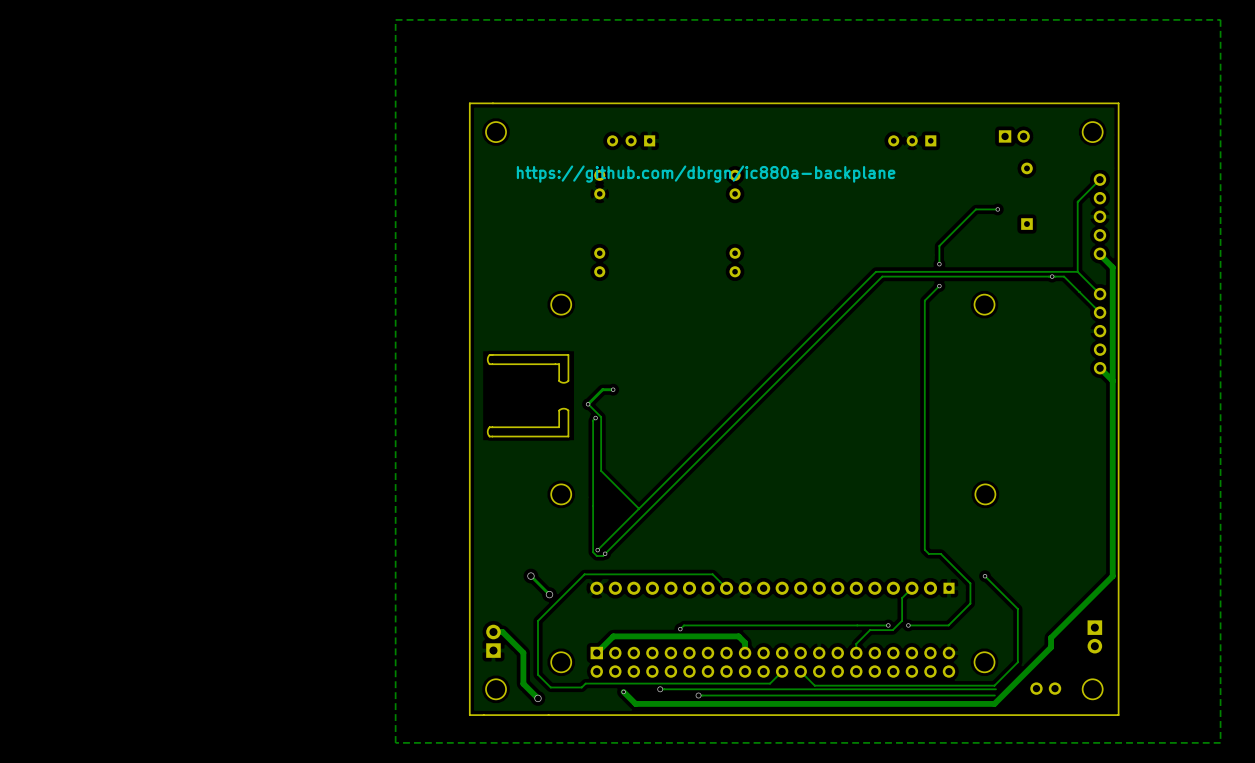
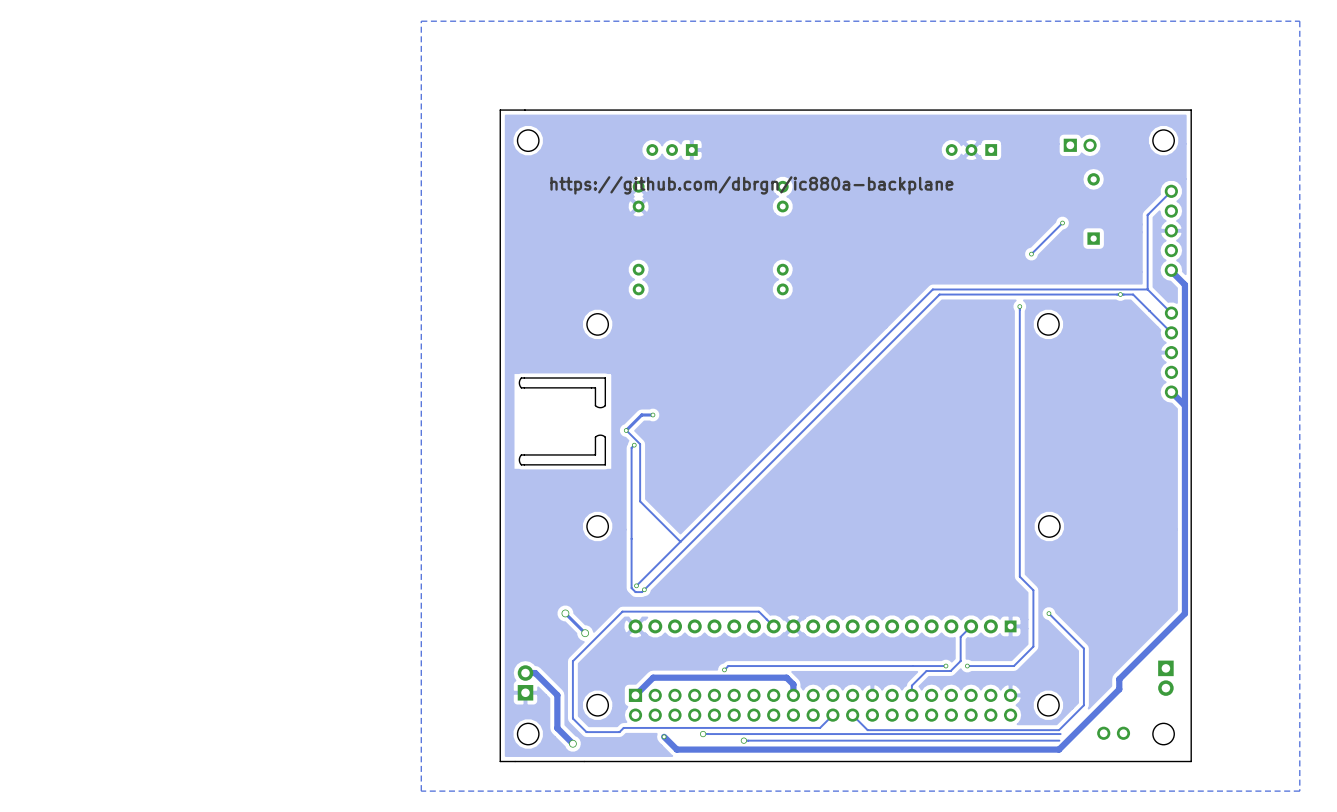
track: (997, 209) (975, 209) (939, 245) (939, 264) -> (1062, 223) (1031, 254)
via: none -> (1031, 254)
via: (939, 264) -> none
track: (939, 286) (924, 300) (924, 549) (928, 553) (940, 553) (970, 583) (970, 603) (948, 625) -> (1019, 306) (1019, 576) (1033, 590) (1033, 646) (1013, 666) (1010, 666)
via: (939, 286) -> none
via: none -> (1019, 306)

